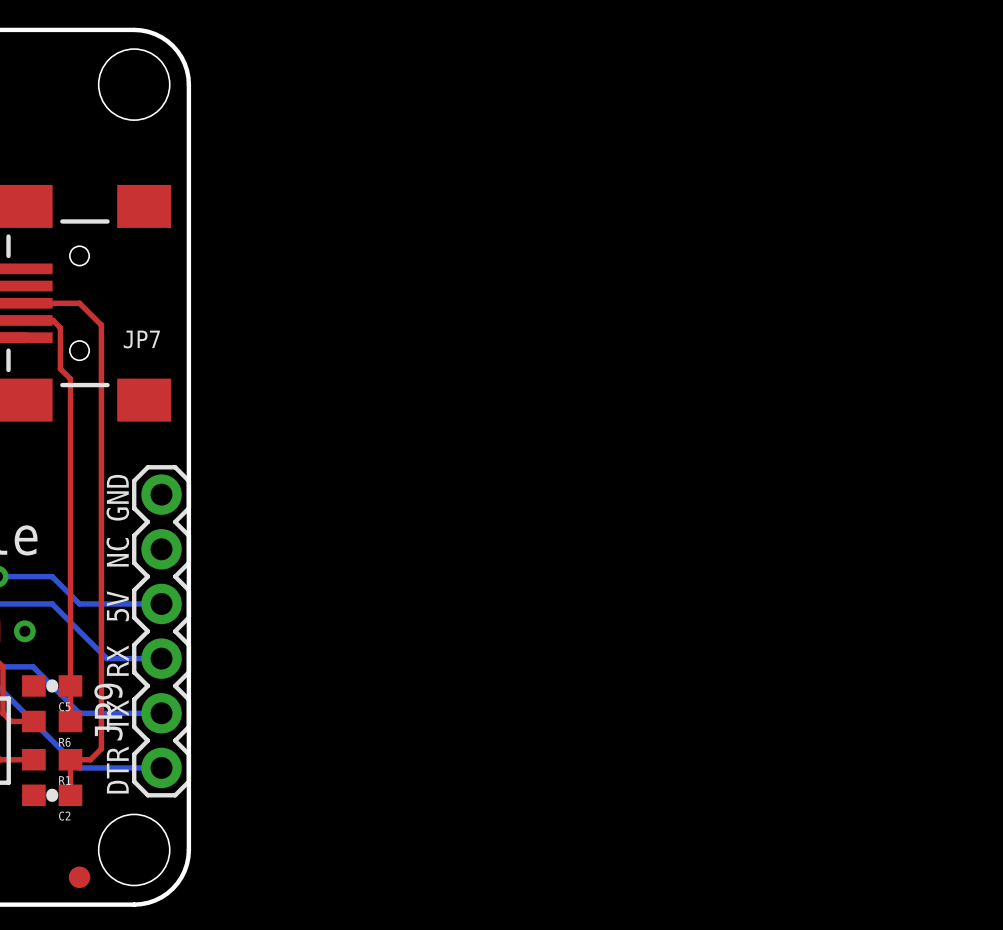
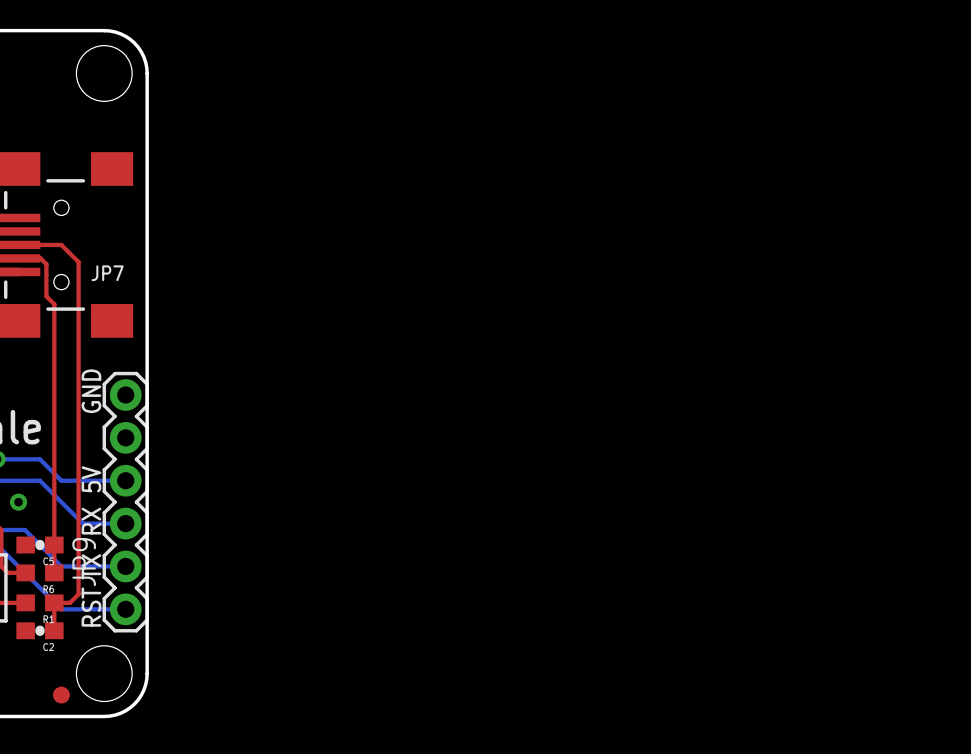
text: NC (117, 552) -> none
text: DTR (117, 770) -> RST (91, 607)

